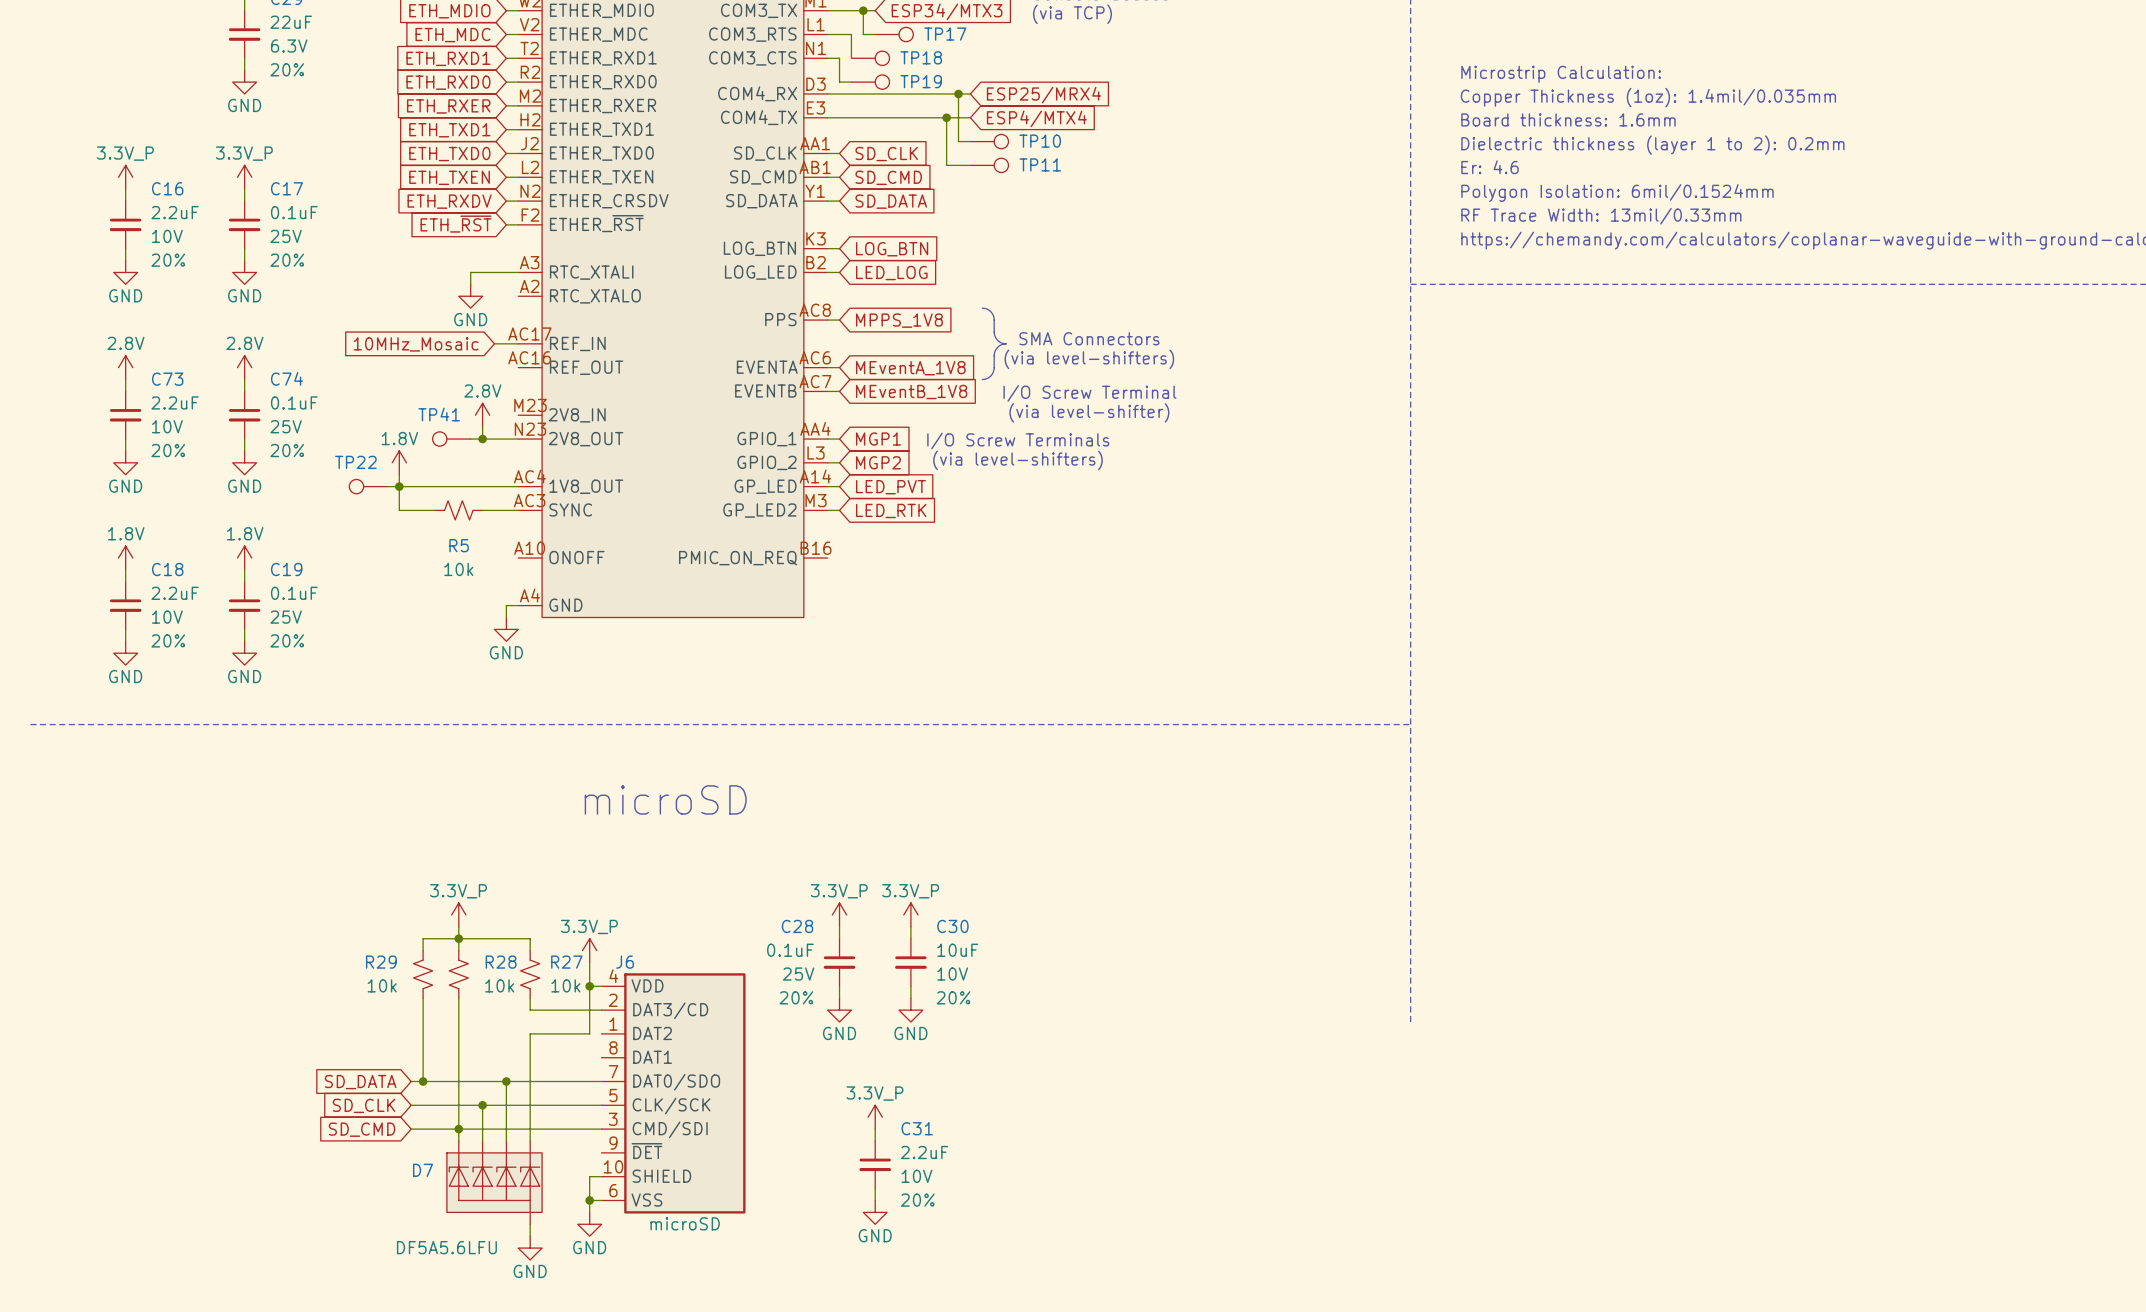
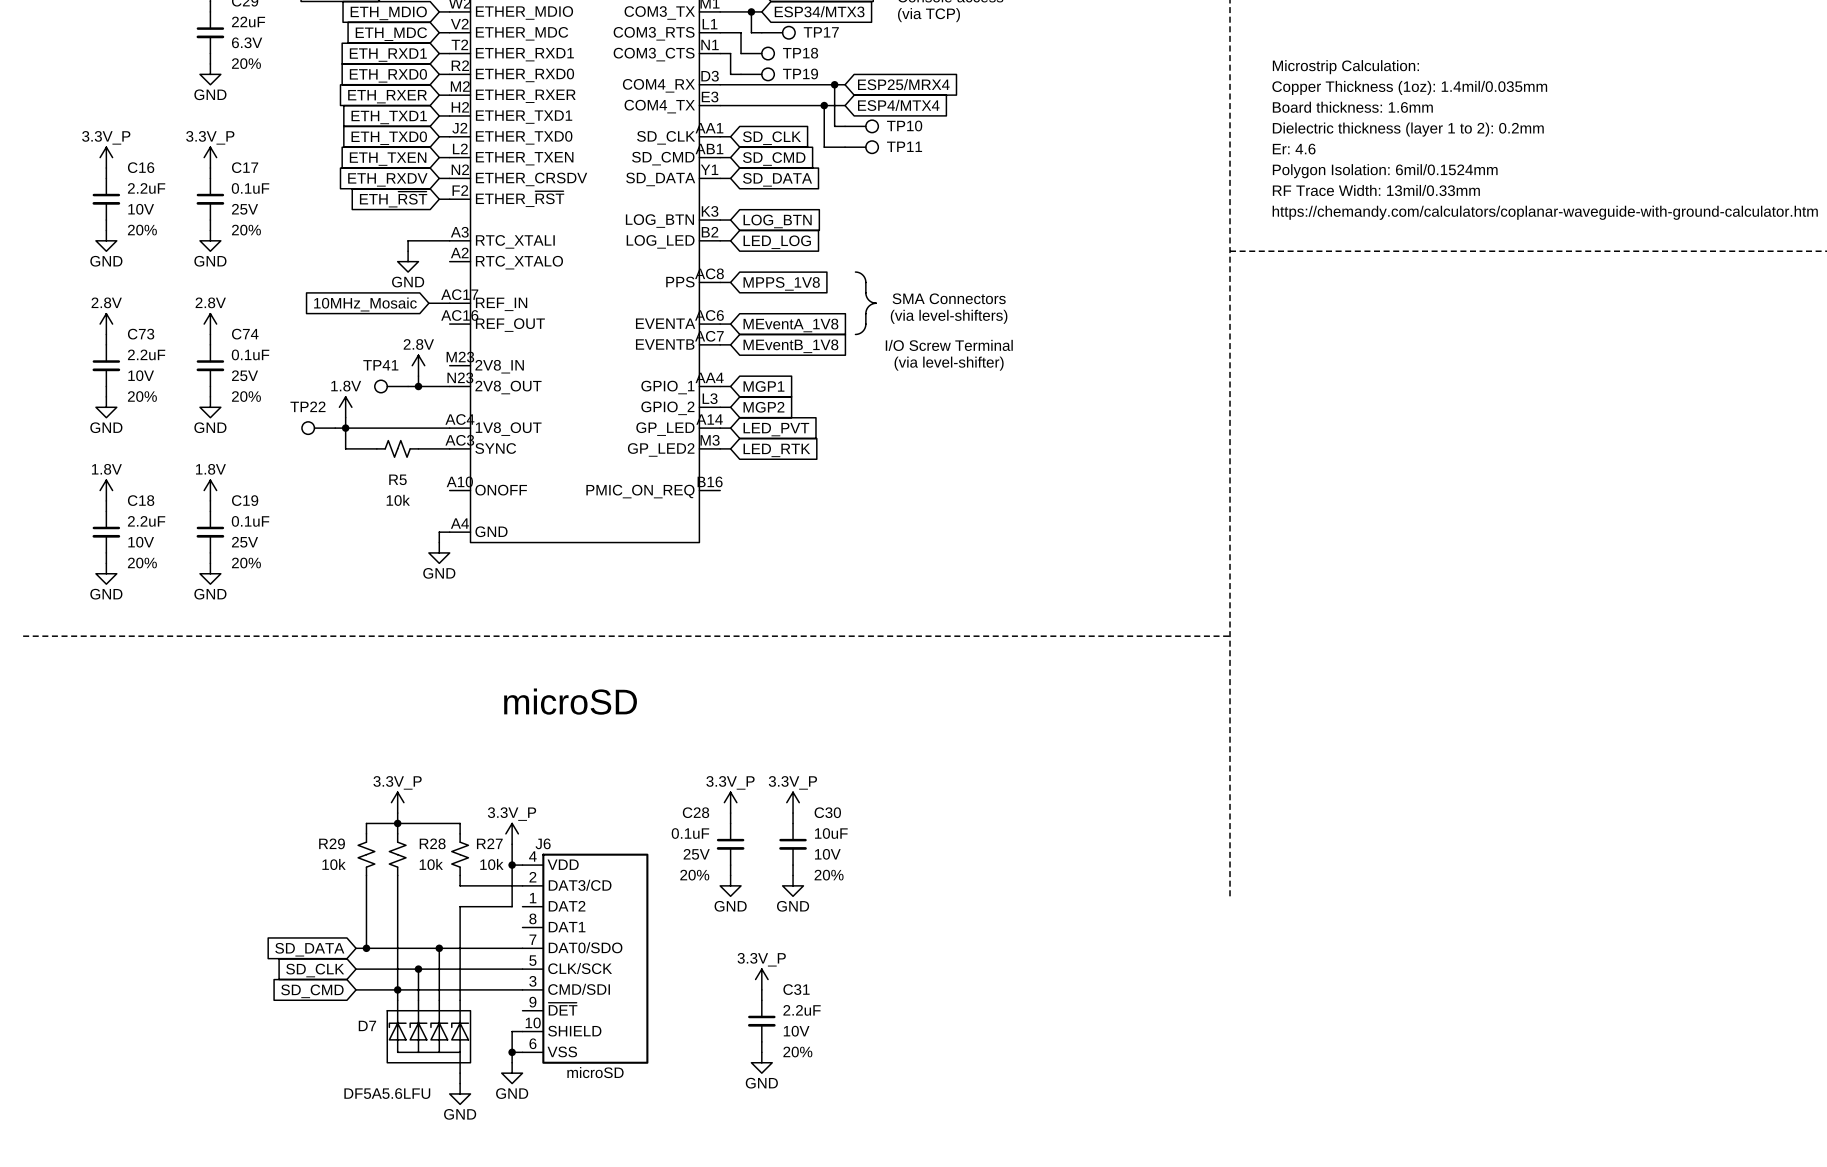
text: I/O Screw Terminals (1018, 441) -> none
text: (via level-shifters) (1018, 460) -> none

